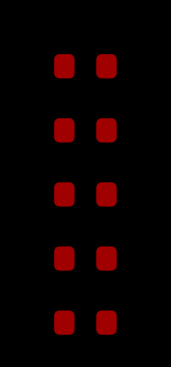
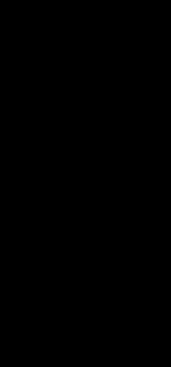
part: (85, 66) -> none
part: (85, 130) -> none
part: (85, 194) -> none
part: (85, 258) -> none
part: (85, 322) -> none

